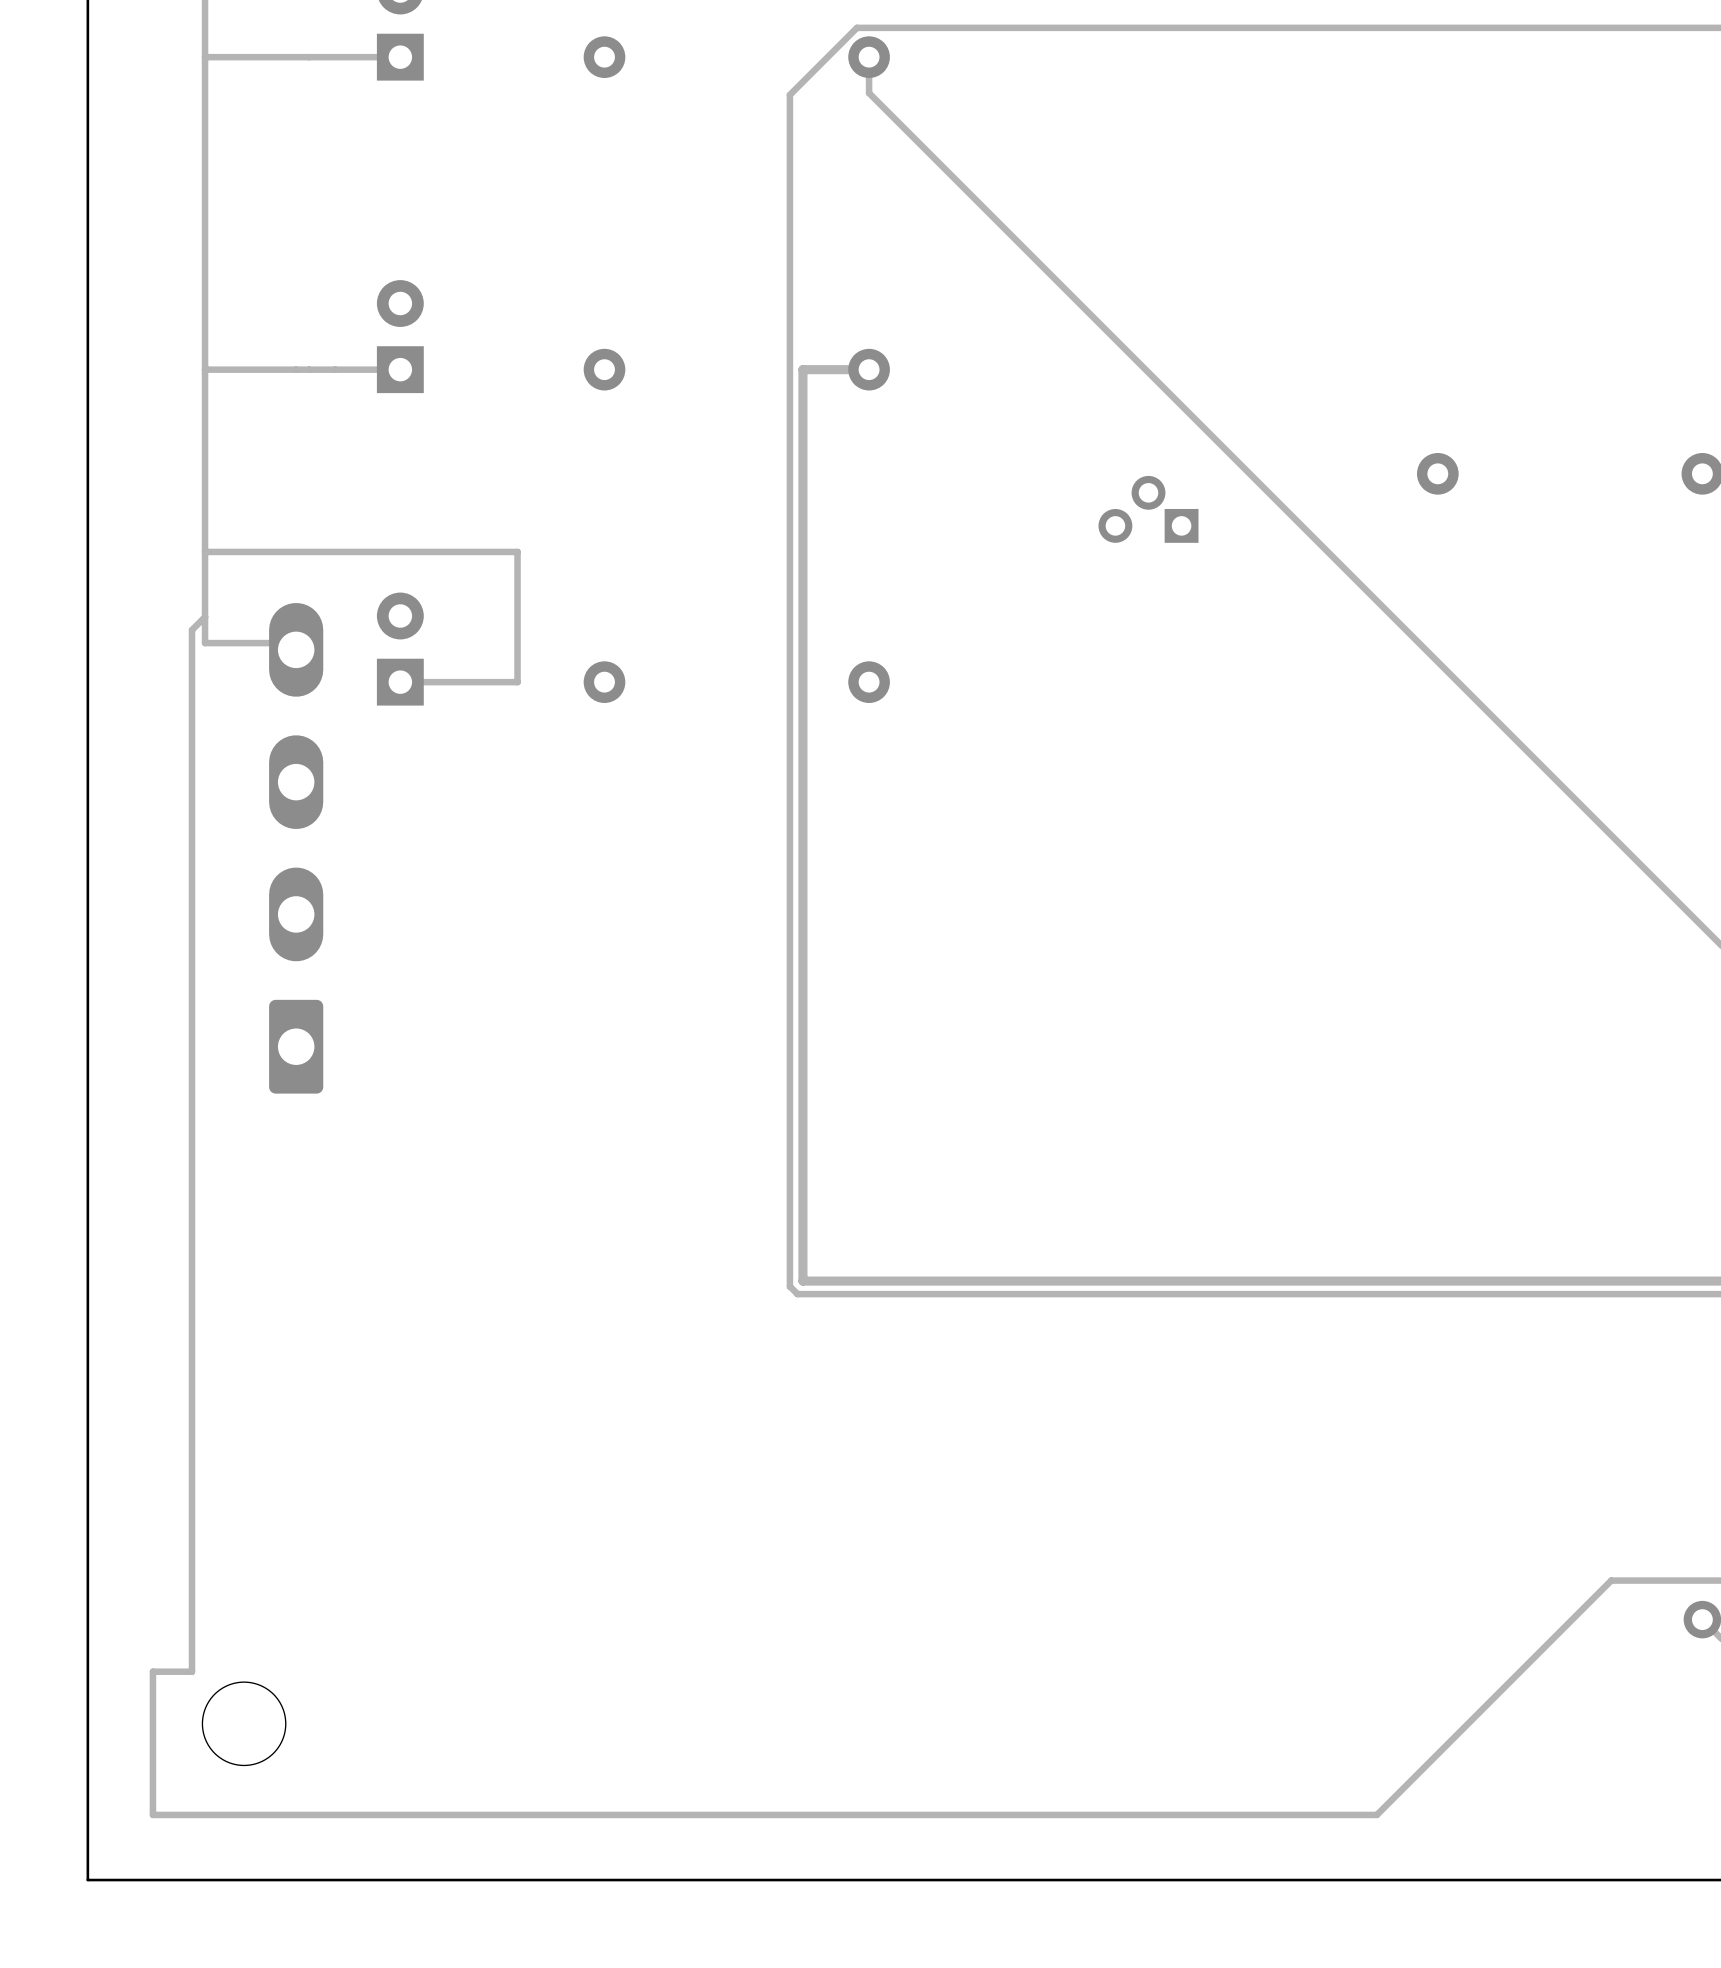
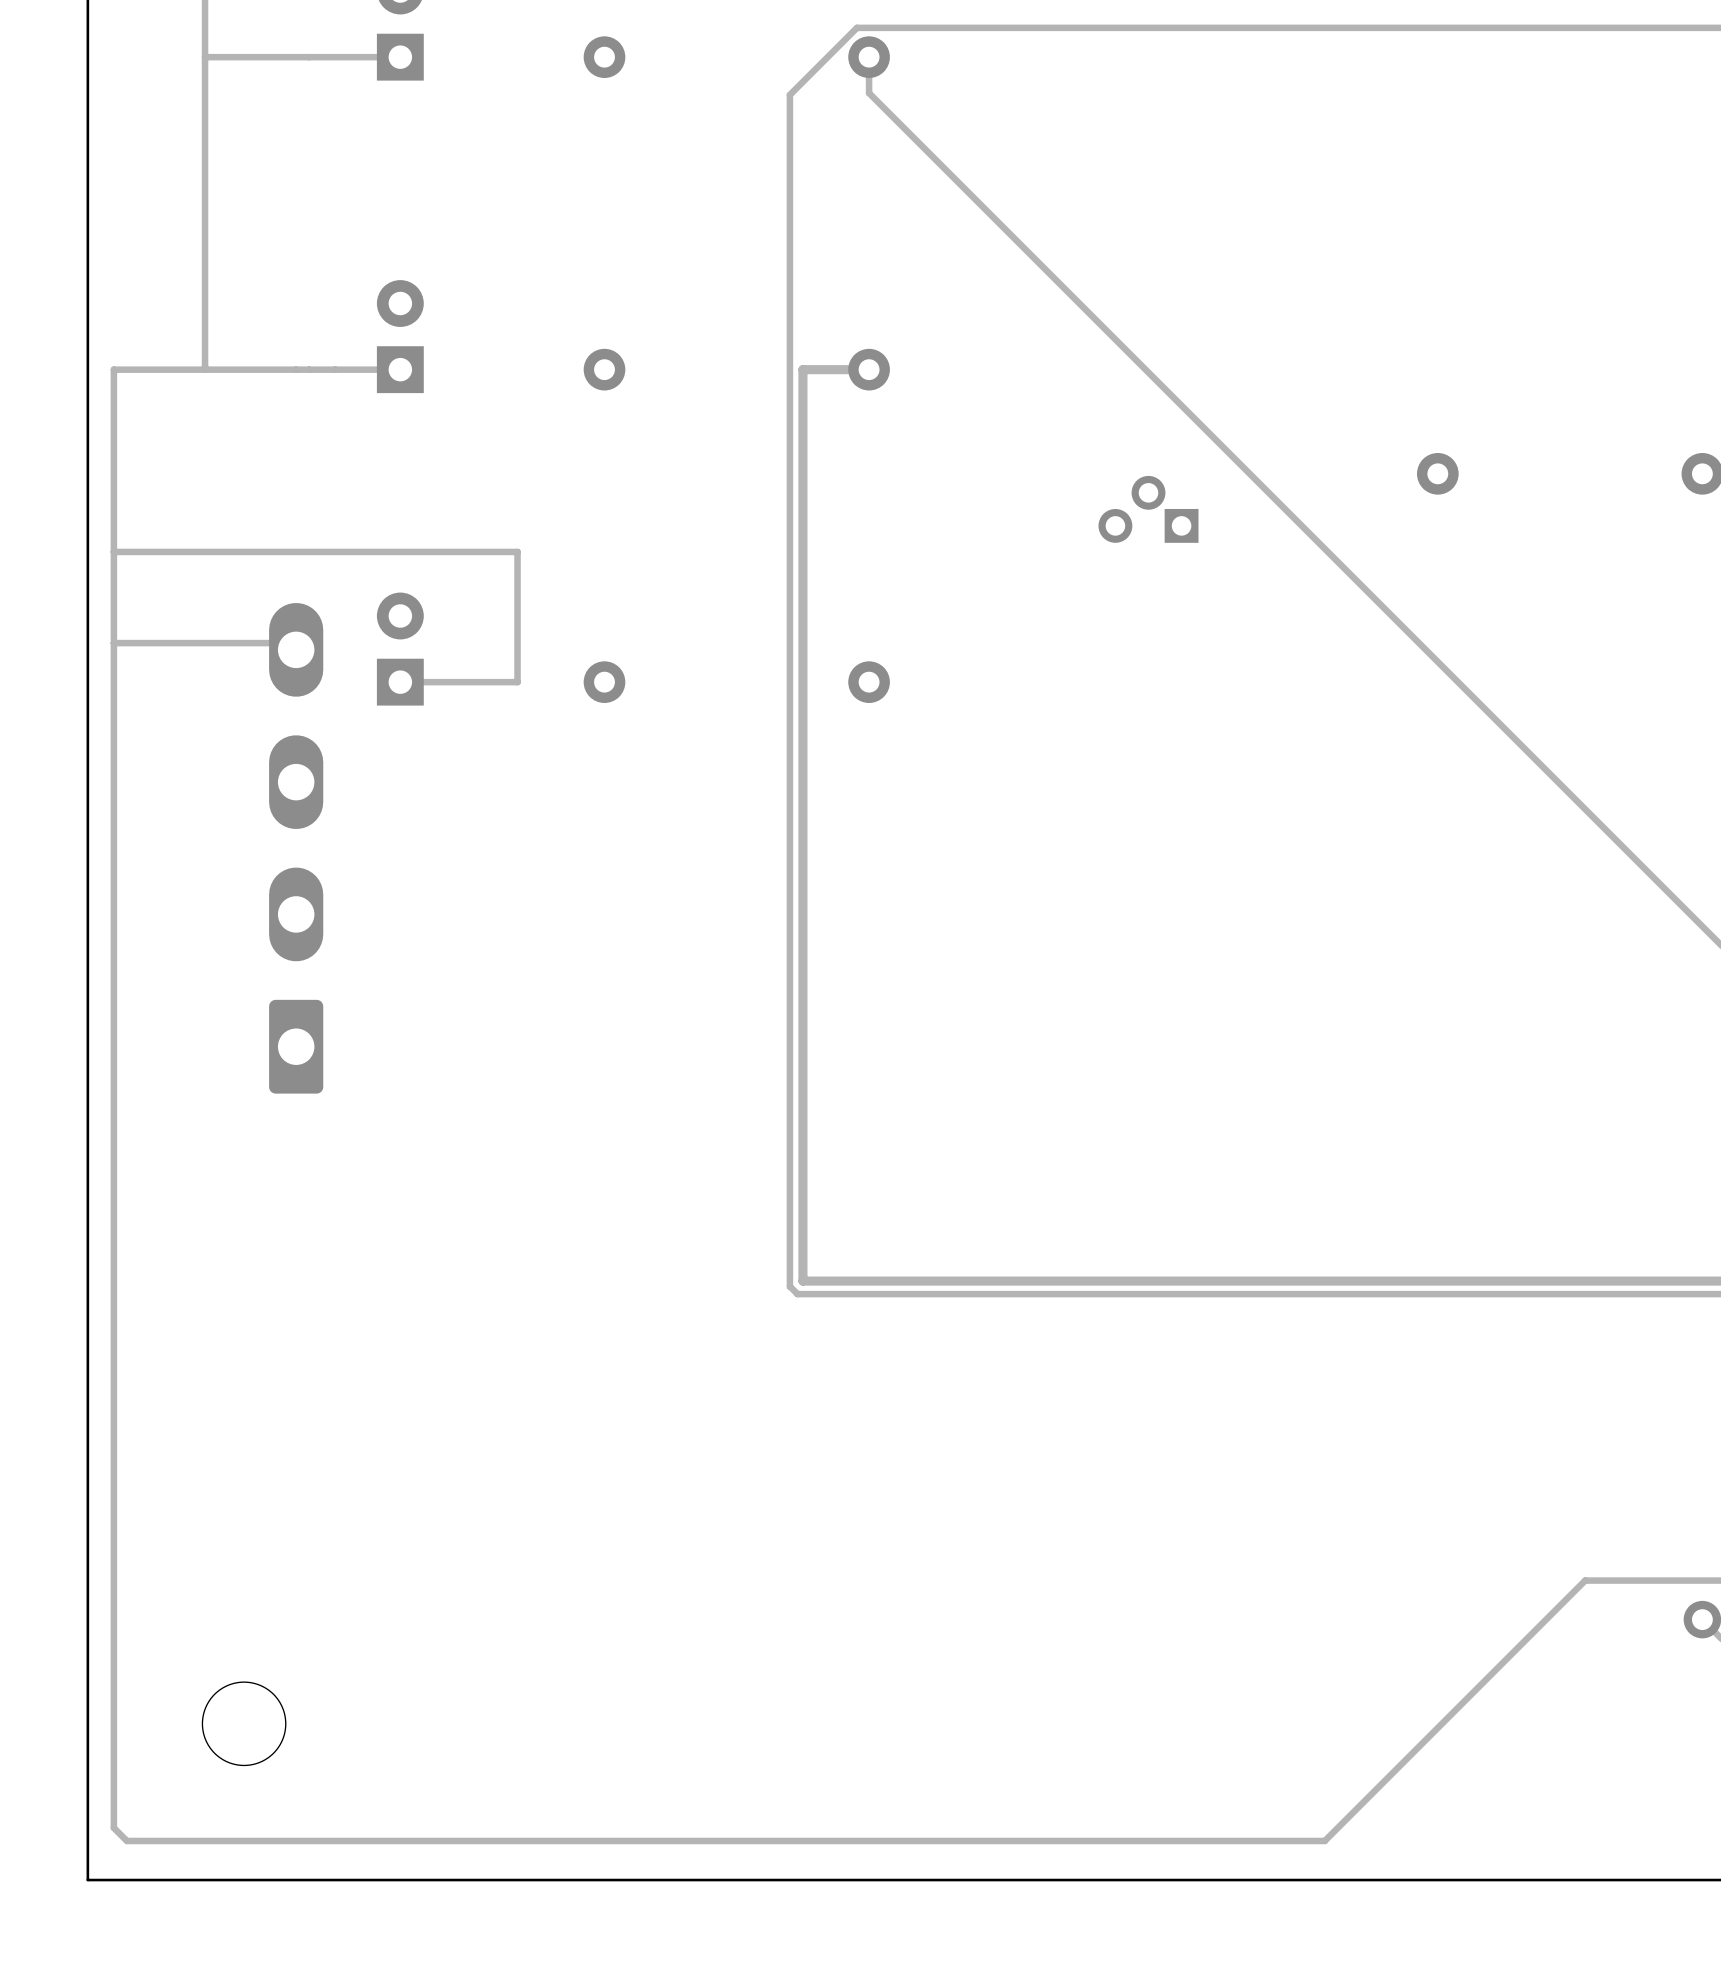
track: (205, 369) (205, 643) -> (113, 643) (205, 643)
track: none -> (205, 551) (113, 551)
track: (205, 617) (192, 630) (192, 1671) (152, 1671) (152, 1814) (1376, 1814) (1611, 1580) -> (205, 369) (113, 369) (113, 1827) (126, 1840) (1324, 1840) (1585, 1580) (1611, 1580)

